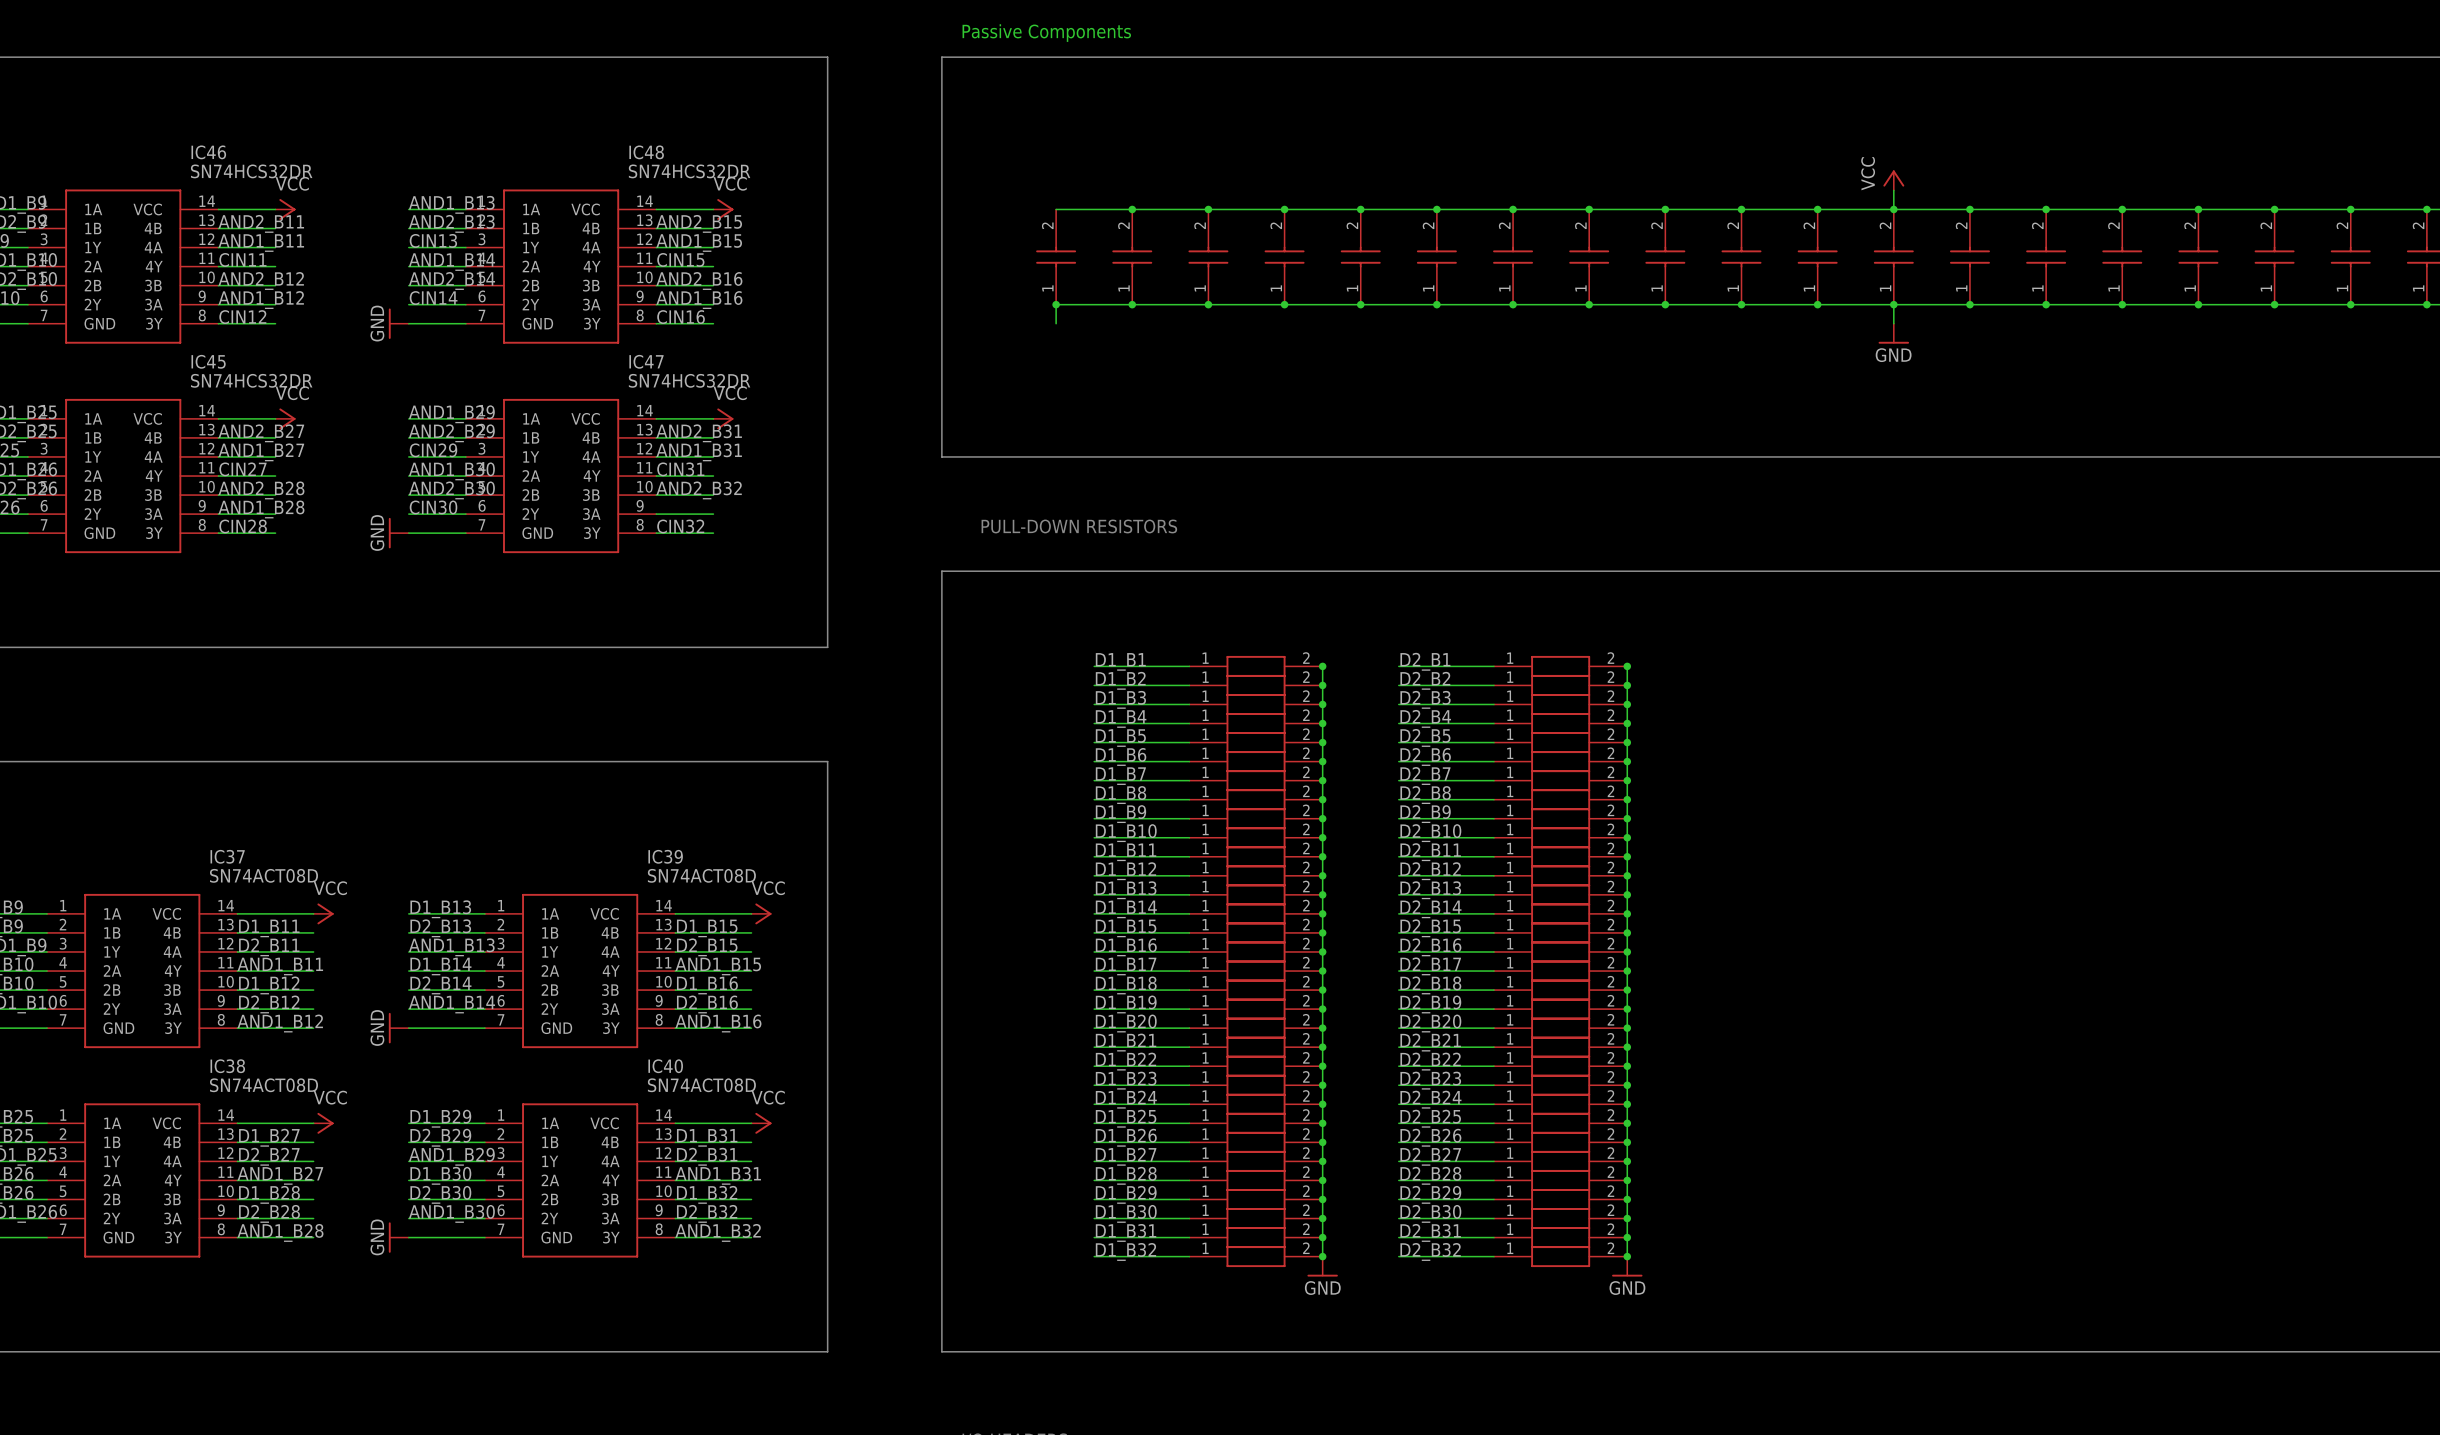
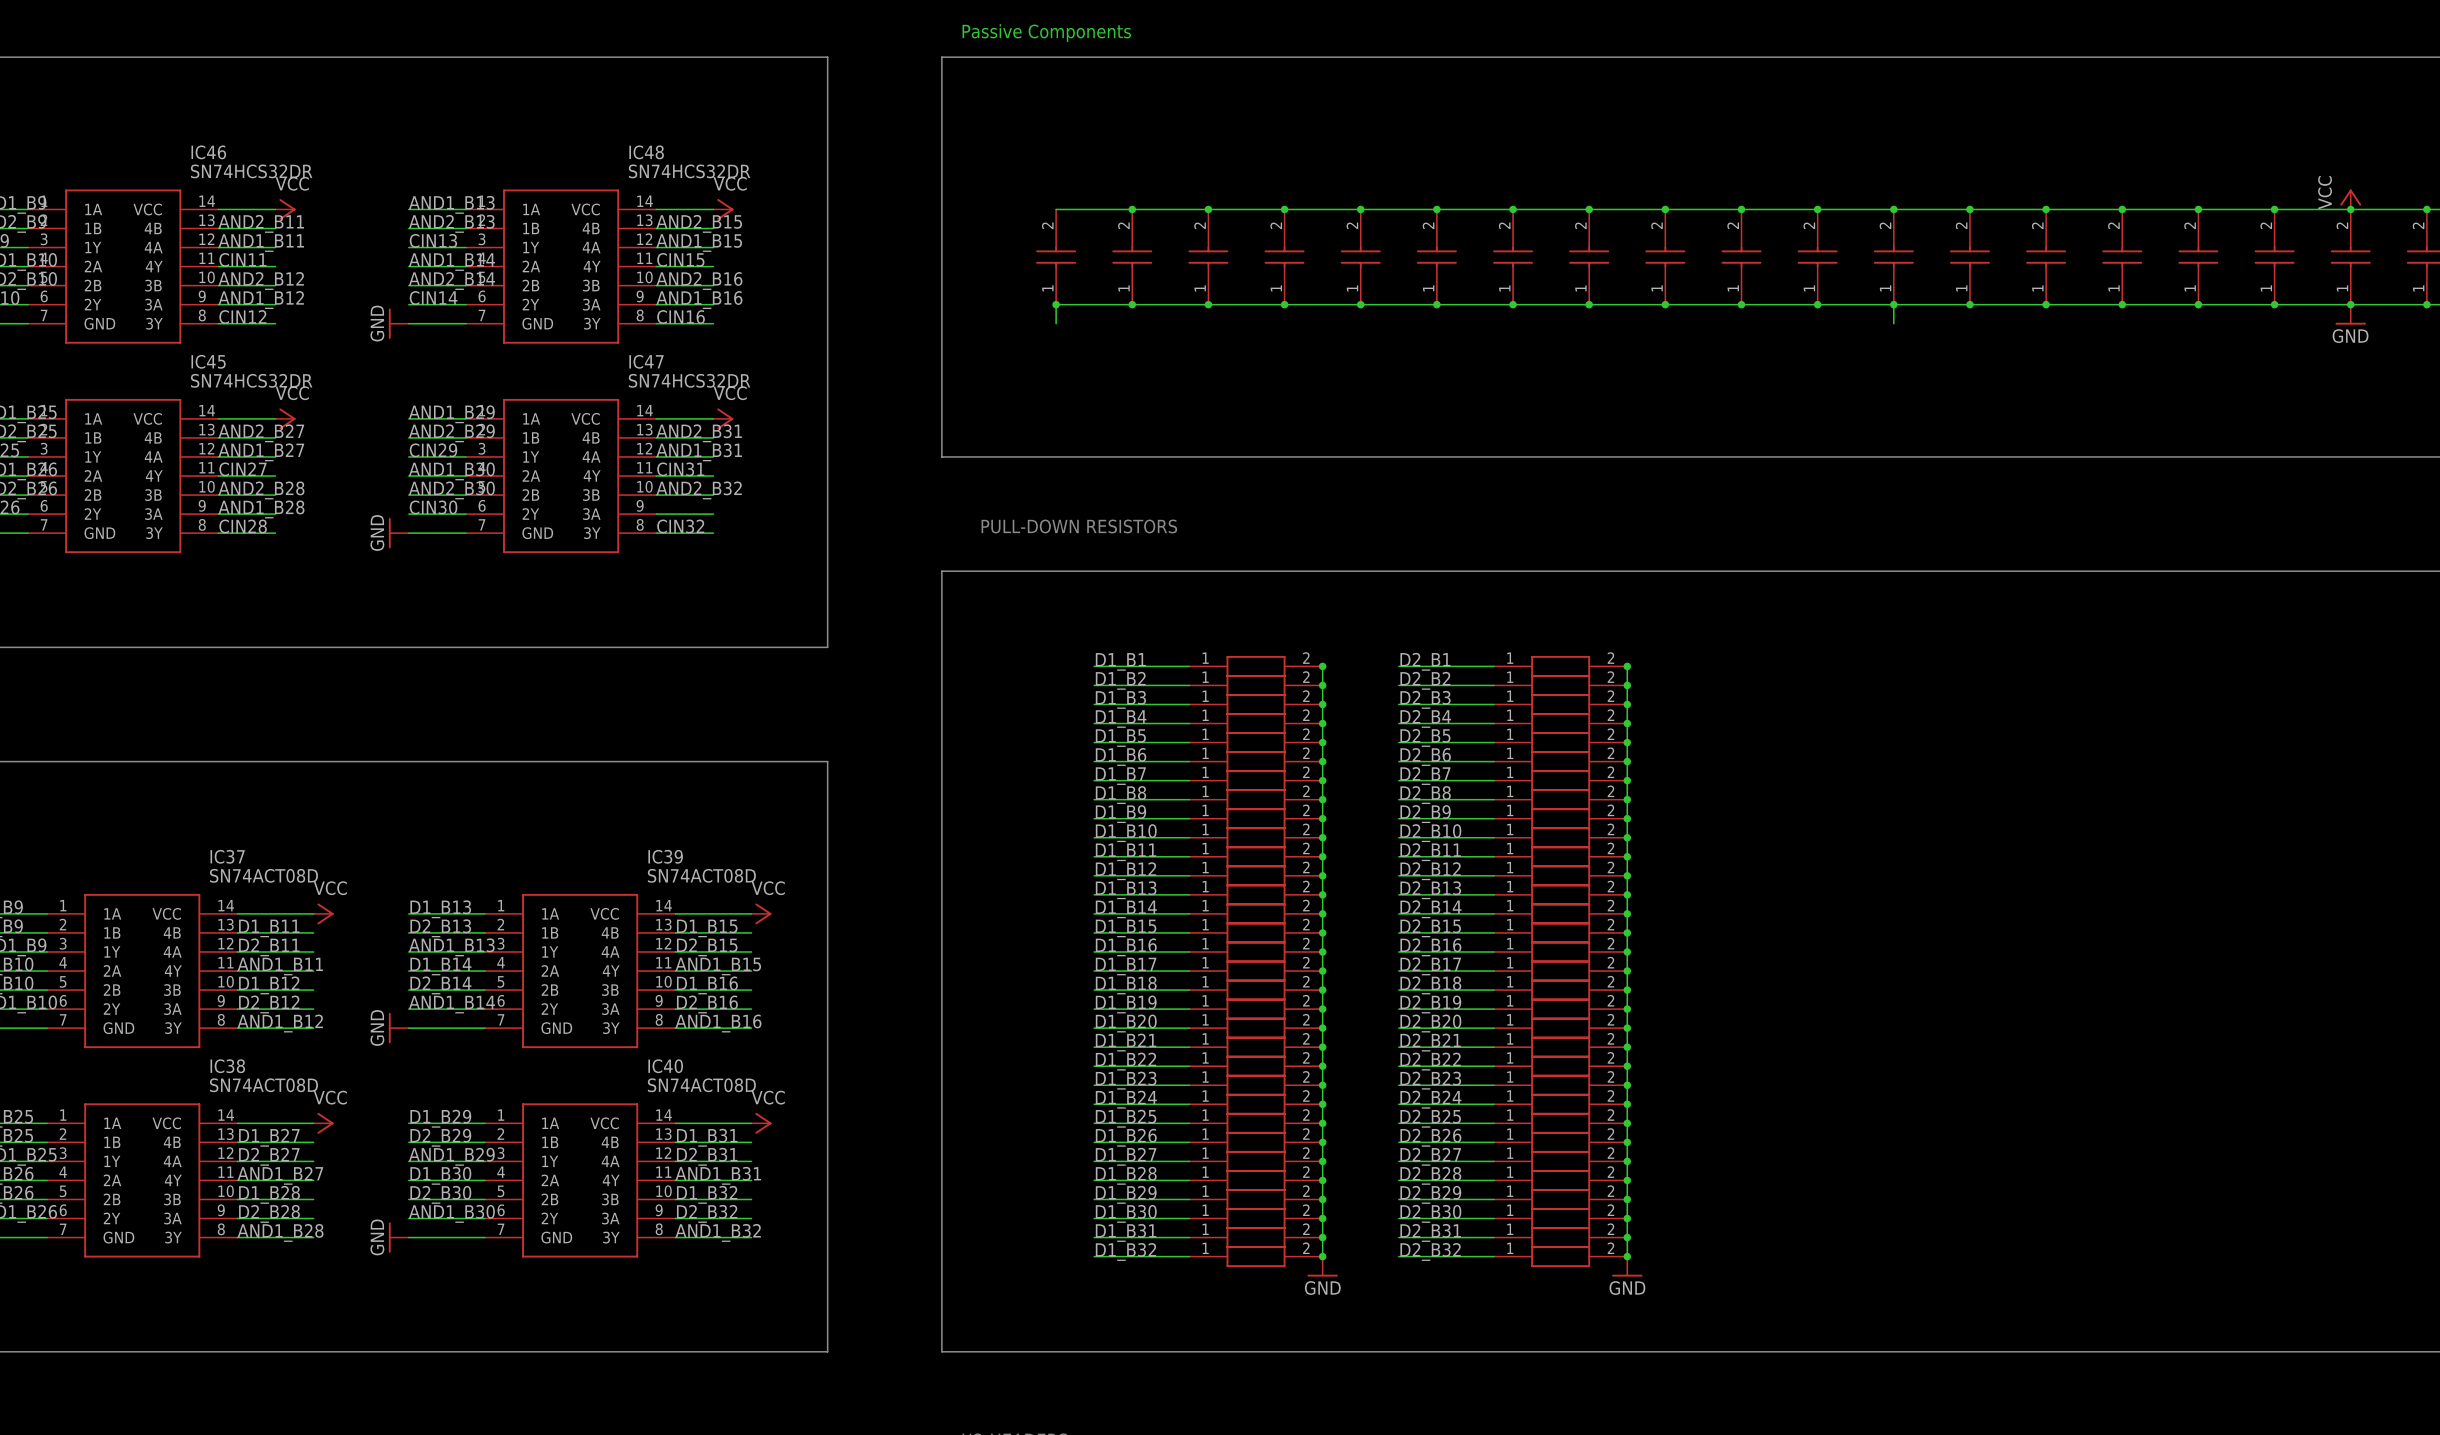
power symbol: VCC (1893, 180) -> none
wire: (1893, 190) (1893, 209) -> none
power symbol: none -> VCC (2350, 199)
power symbol: none -> GND (2350, 314)
power symbol: GND (1893, 333) -> none

